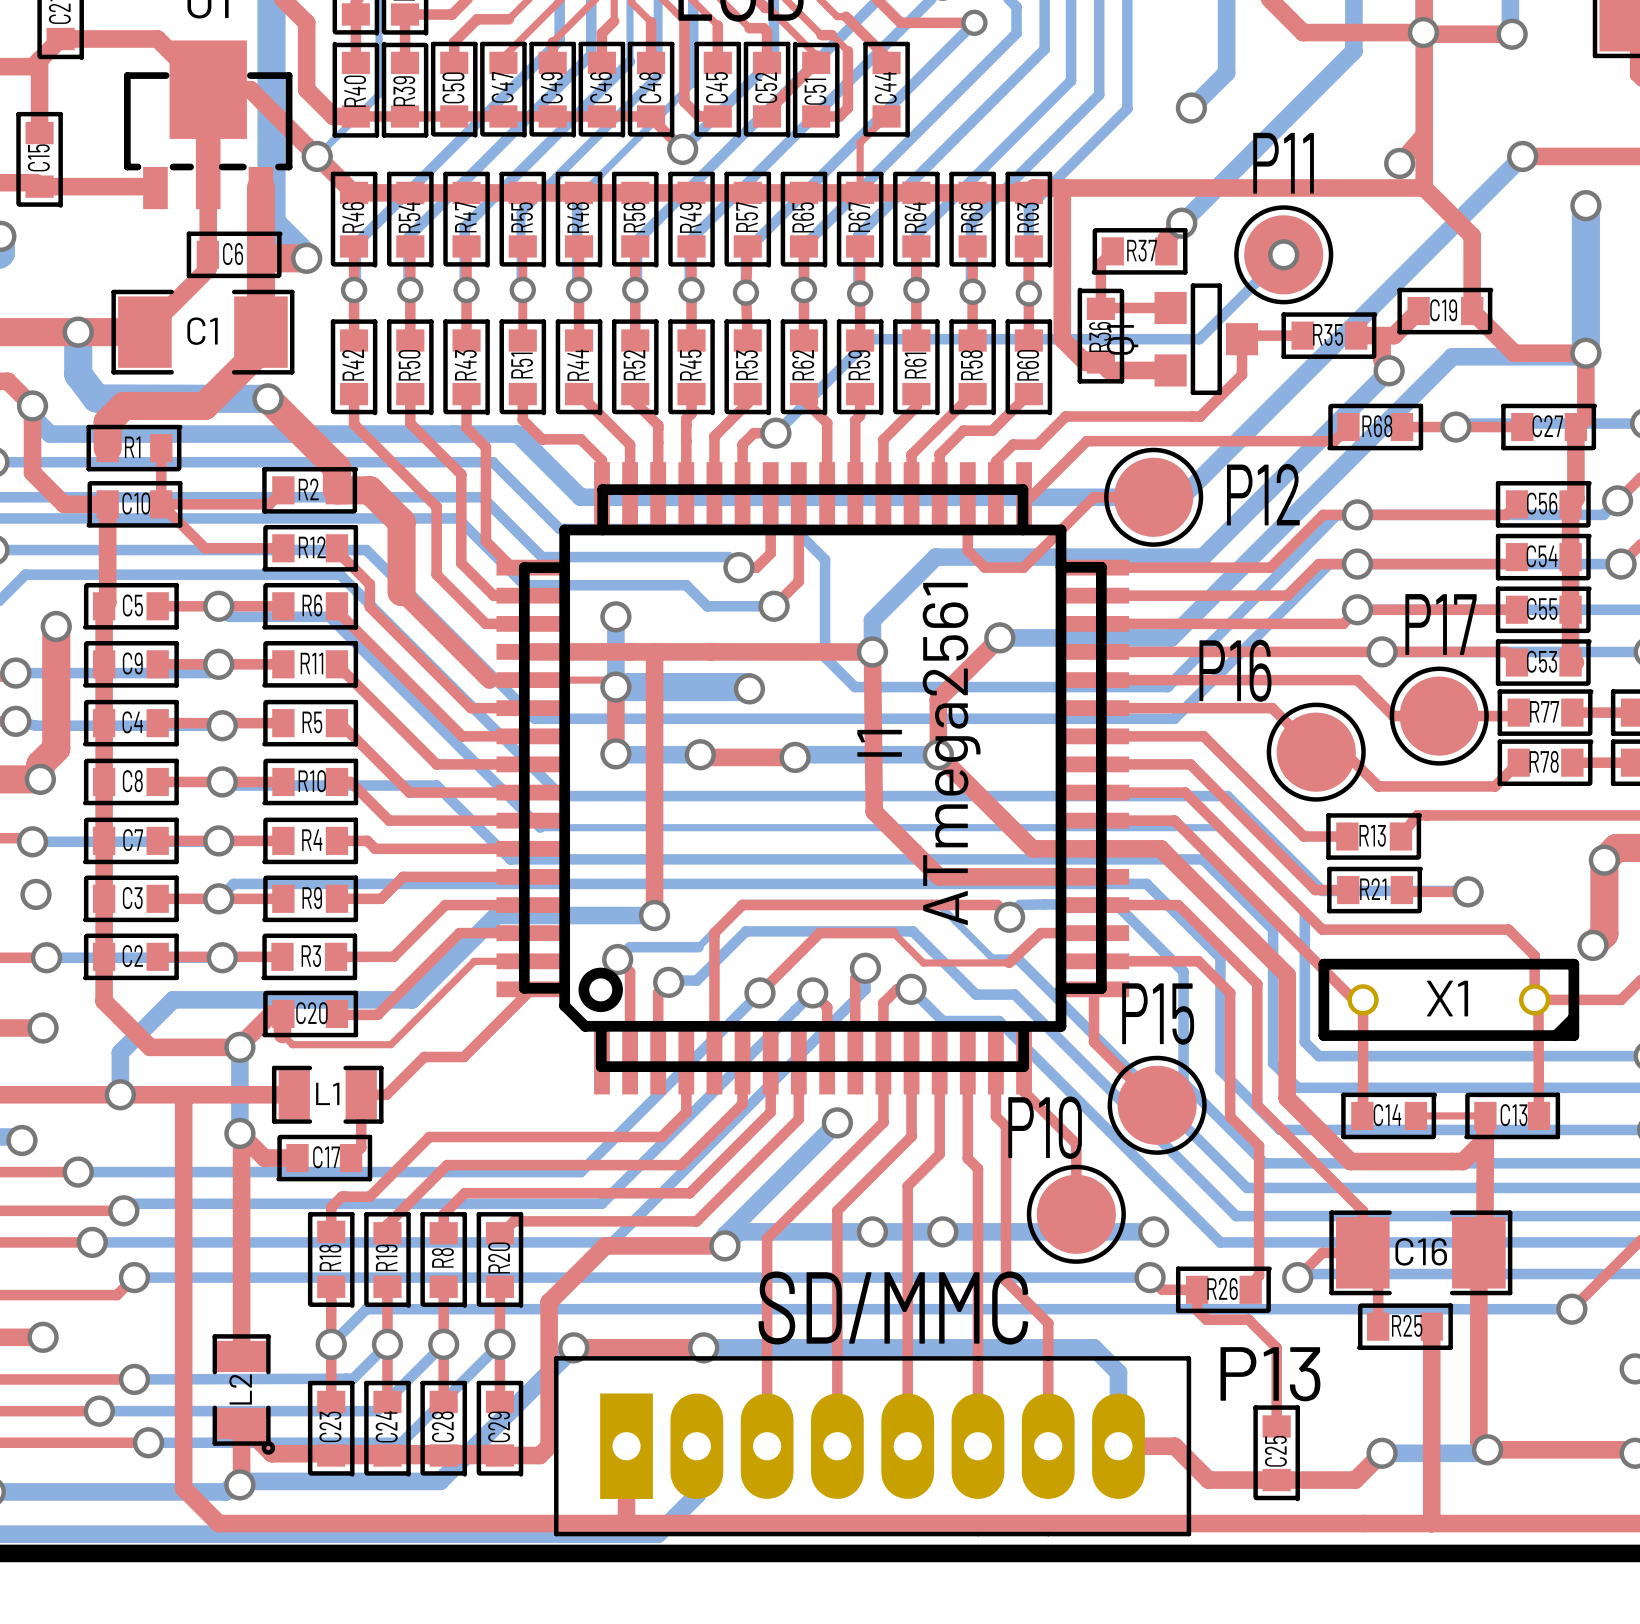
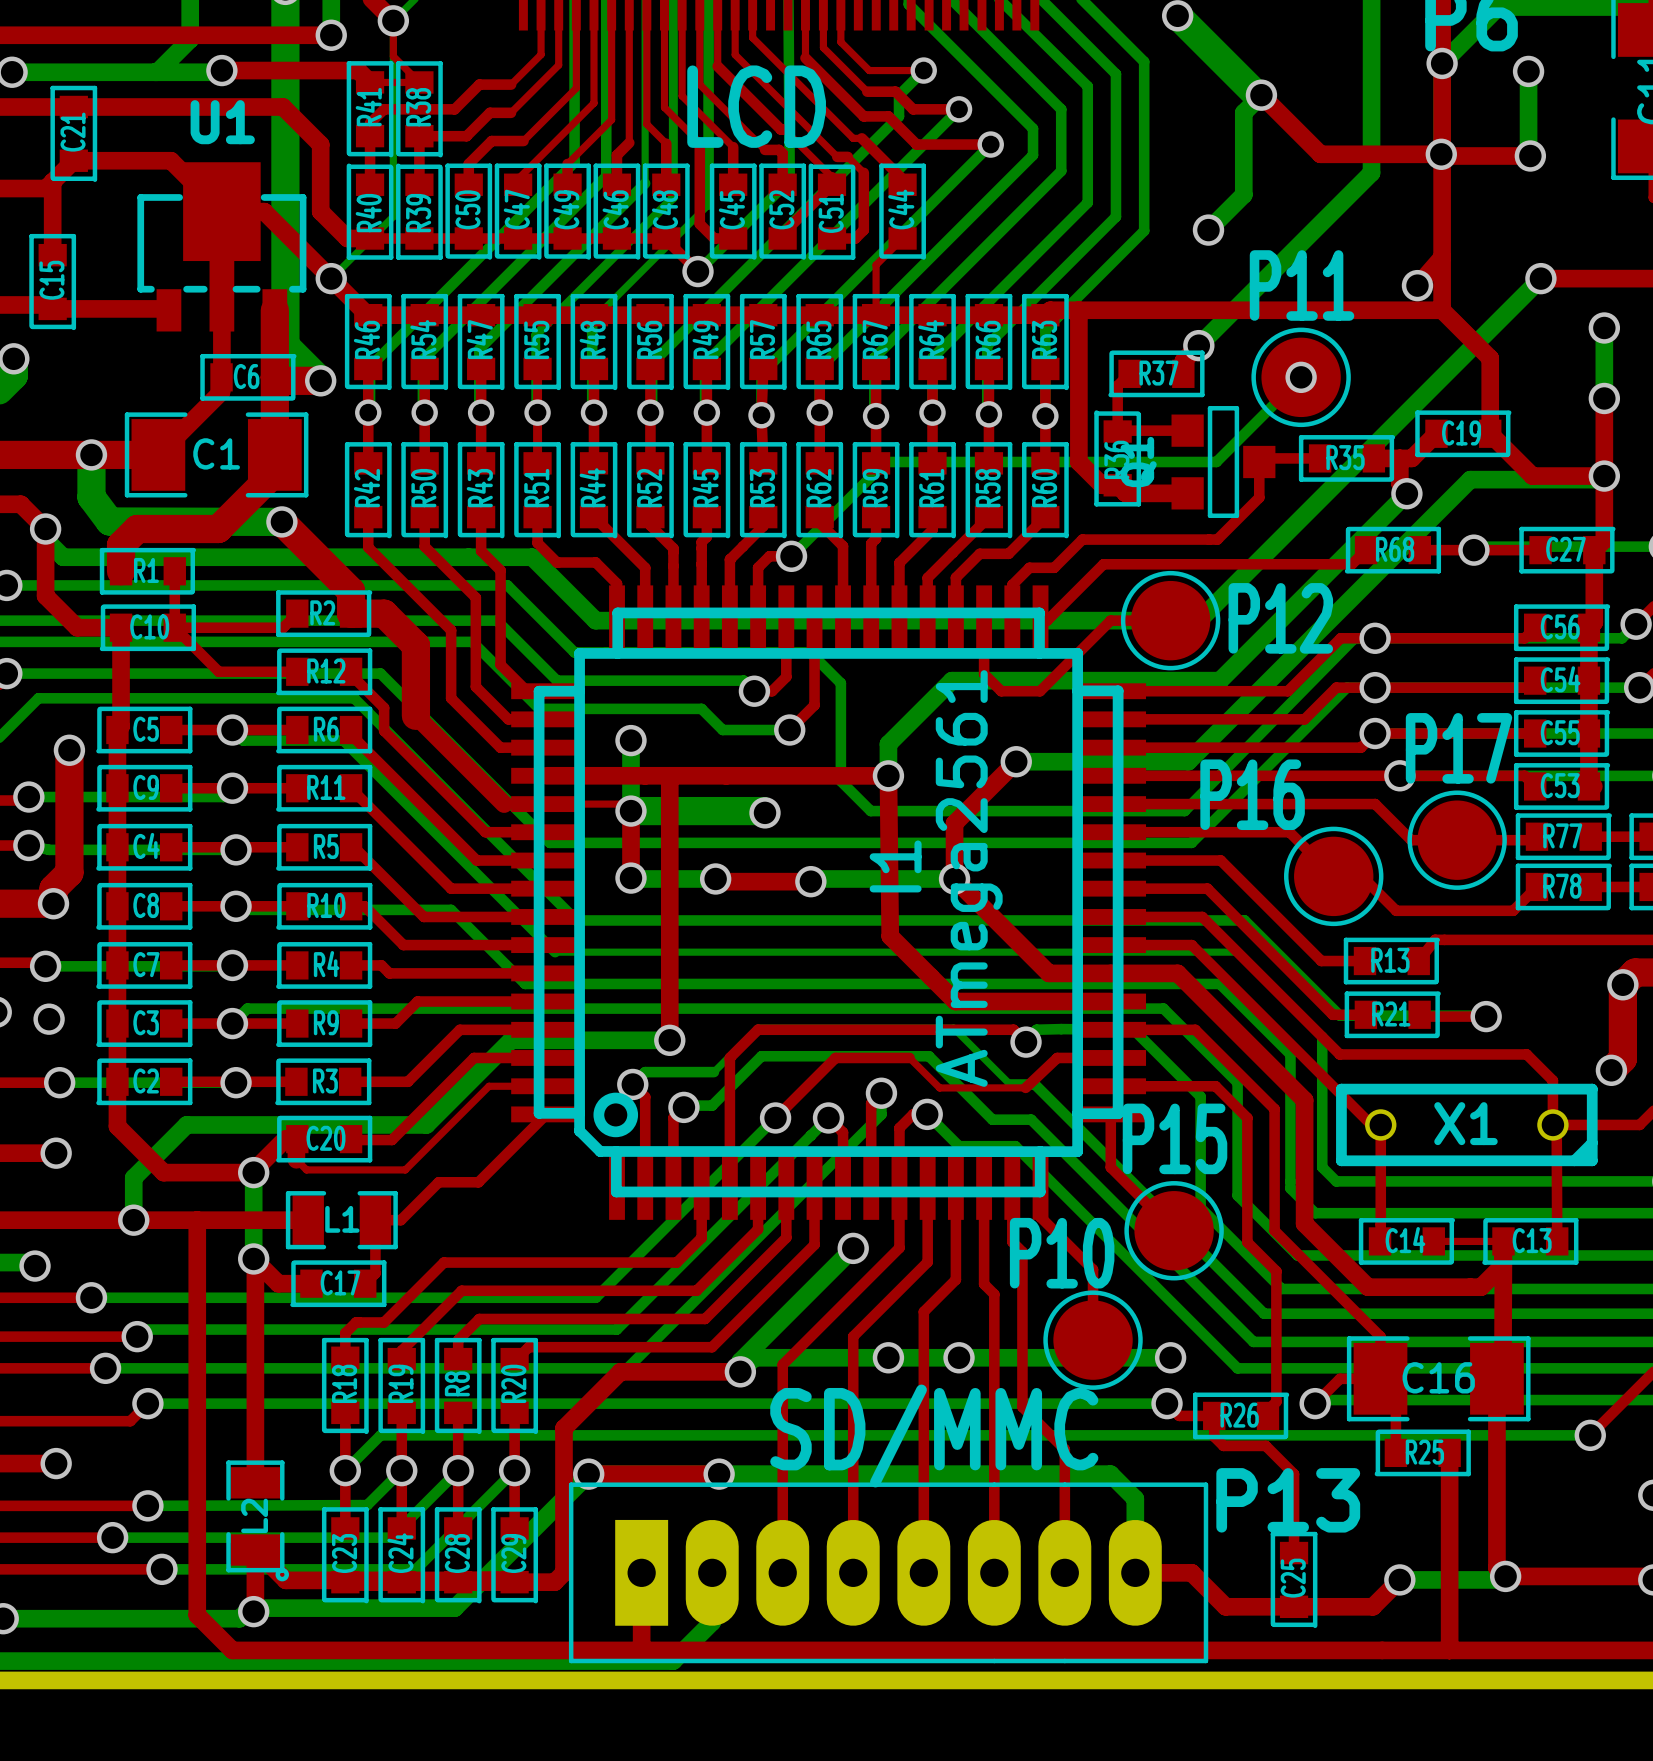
bottom track width: thick (1585, 205) (1585, 275) -> thin (1604, 327) (1604, 398)
top track: none -> (1604, 398) (1604, 476)
bottom track: (1585, 275) (1585, 353) -> none
via: none -> (1604, 398)
text position: SD/MMC (893, 1308) -> SD/MMC (934, 1436)

